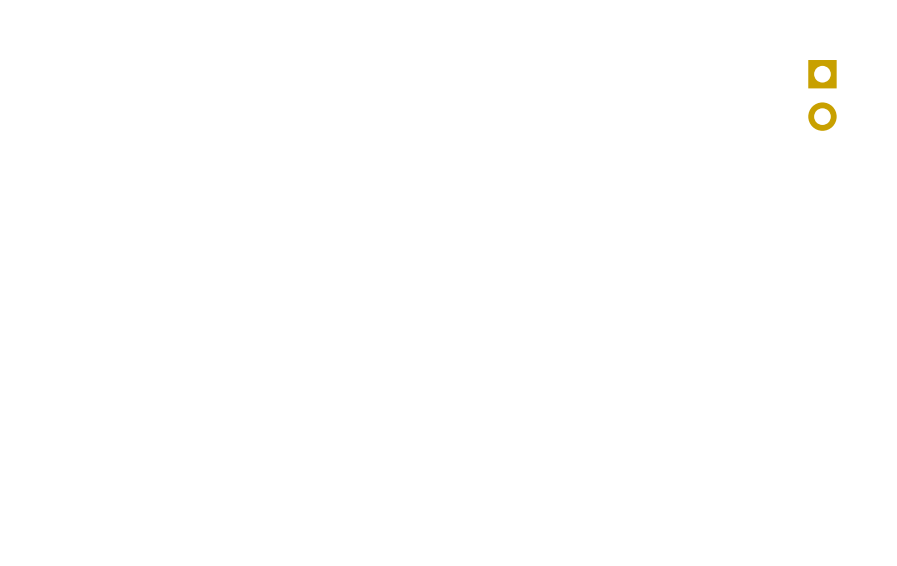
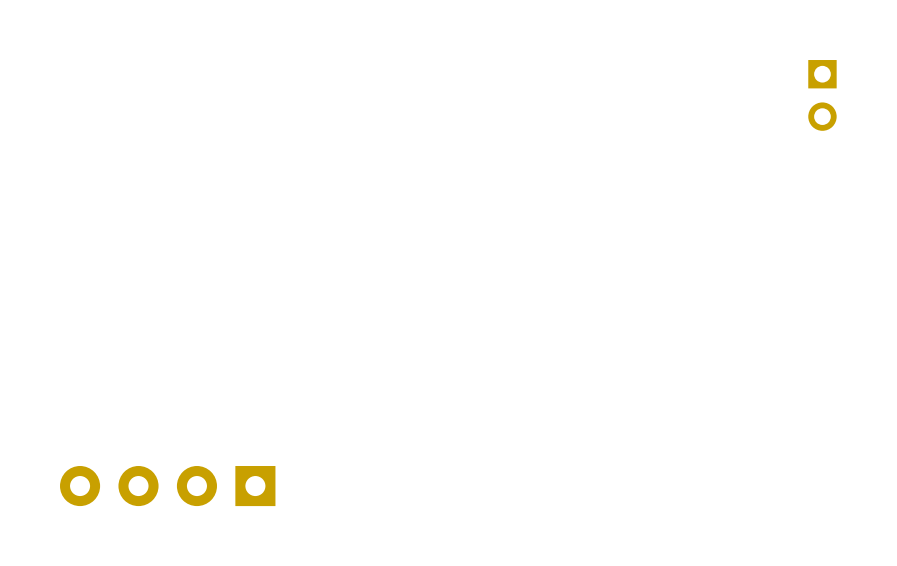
part: none -> (167, 486)

